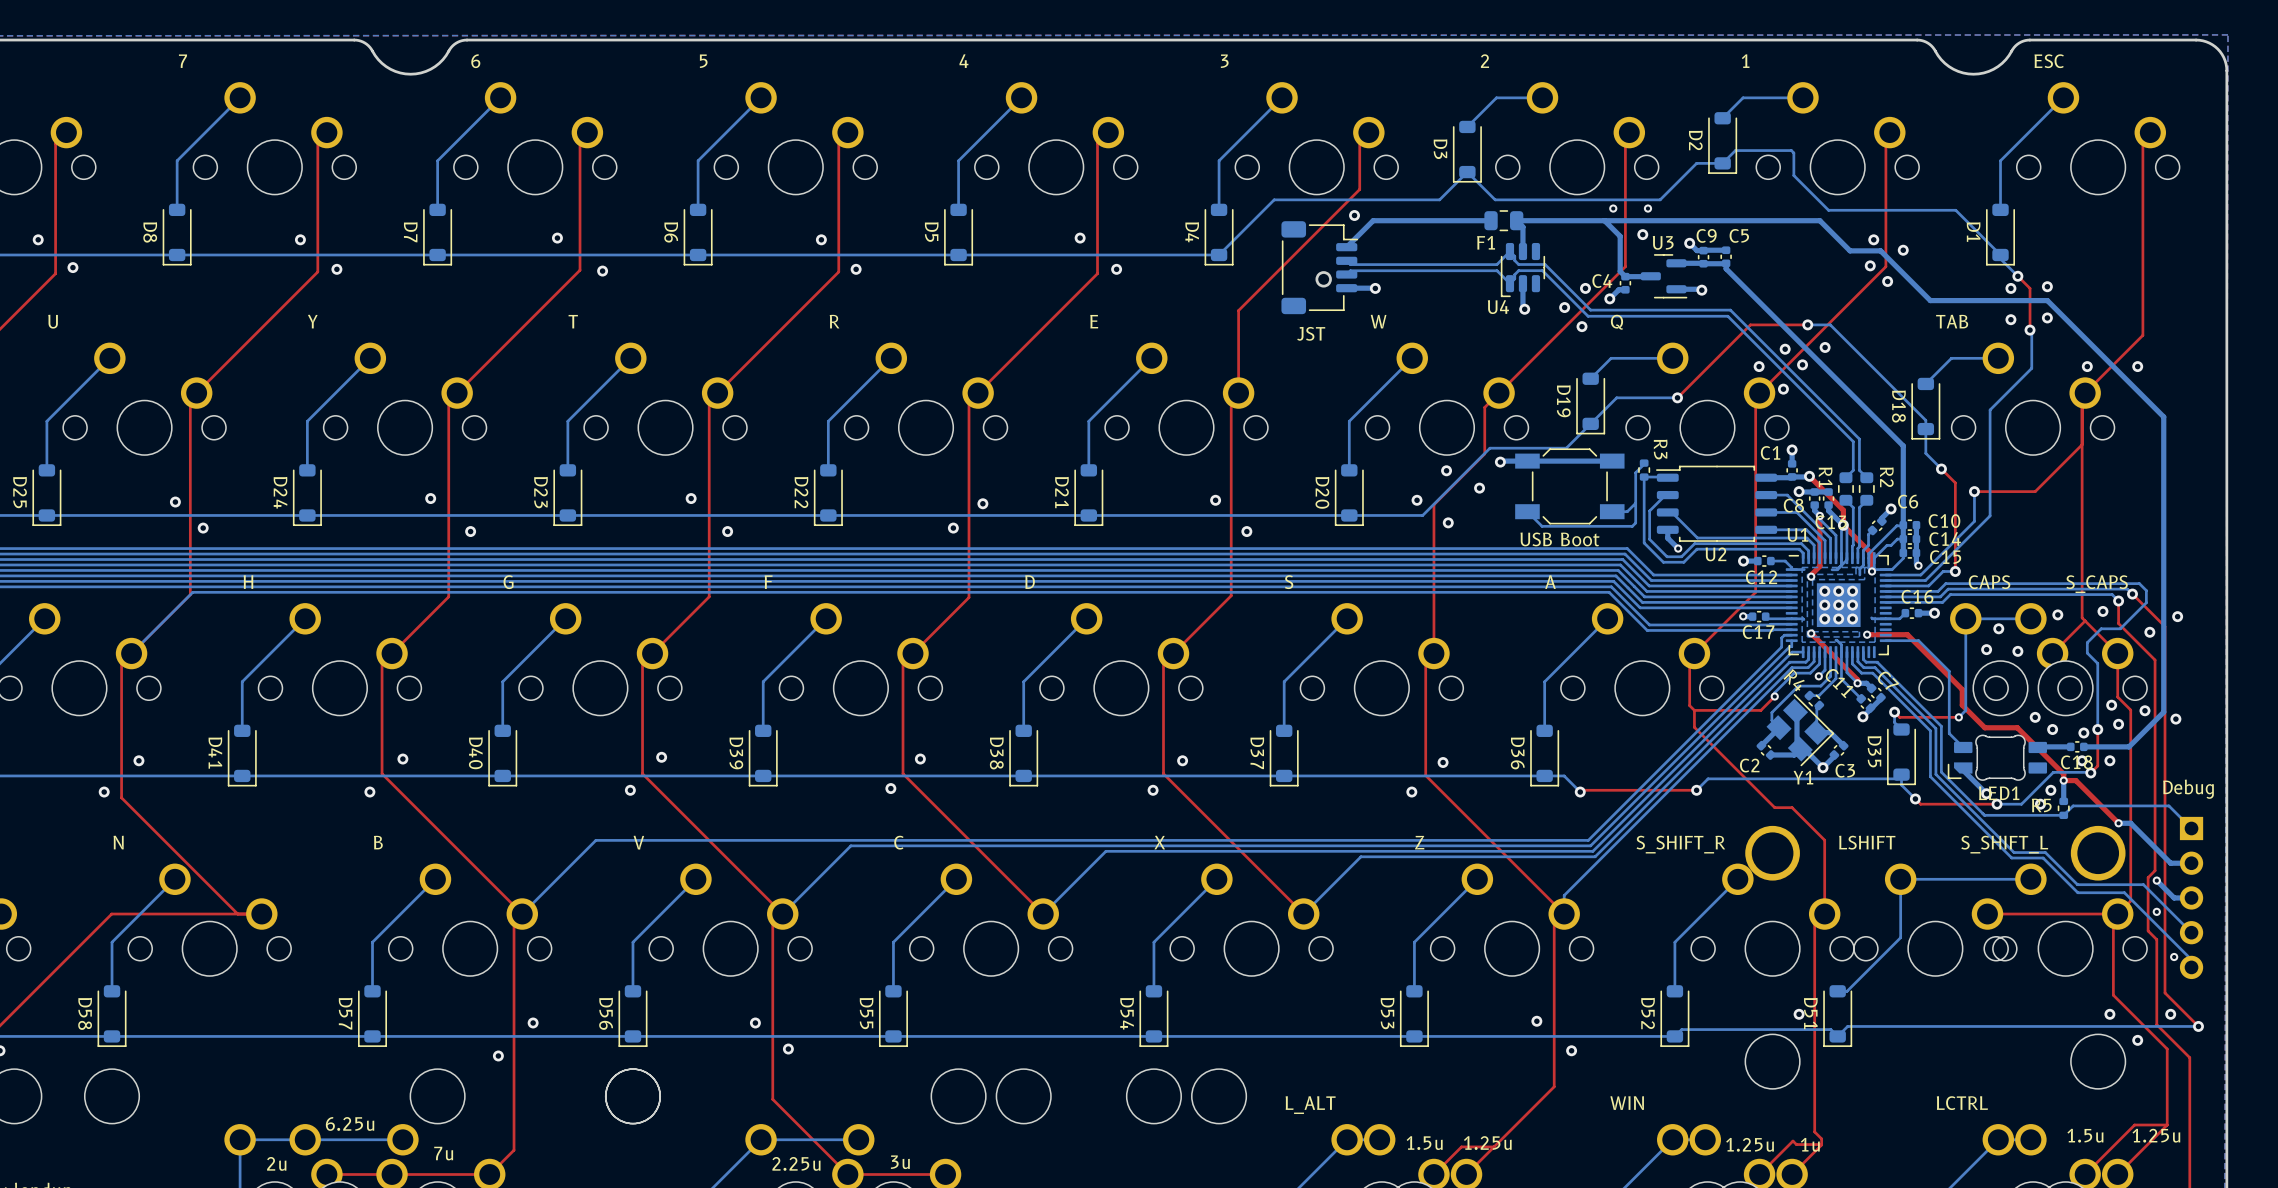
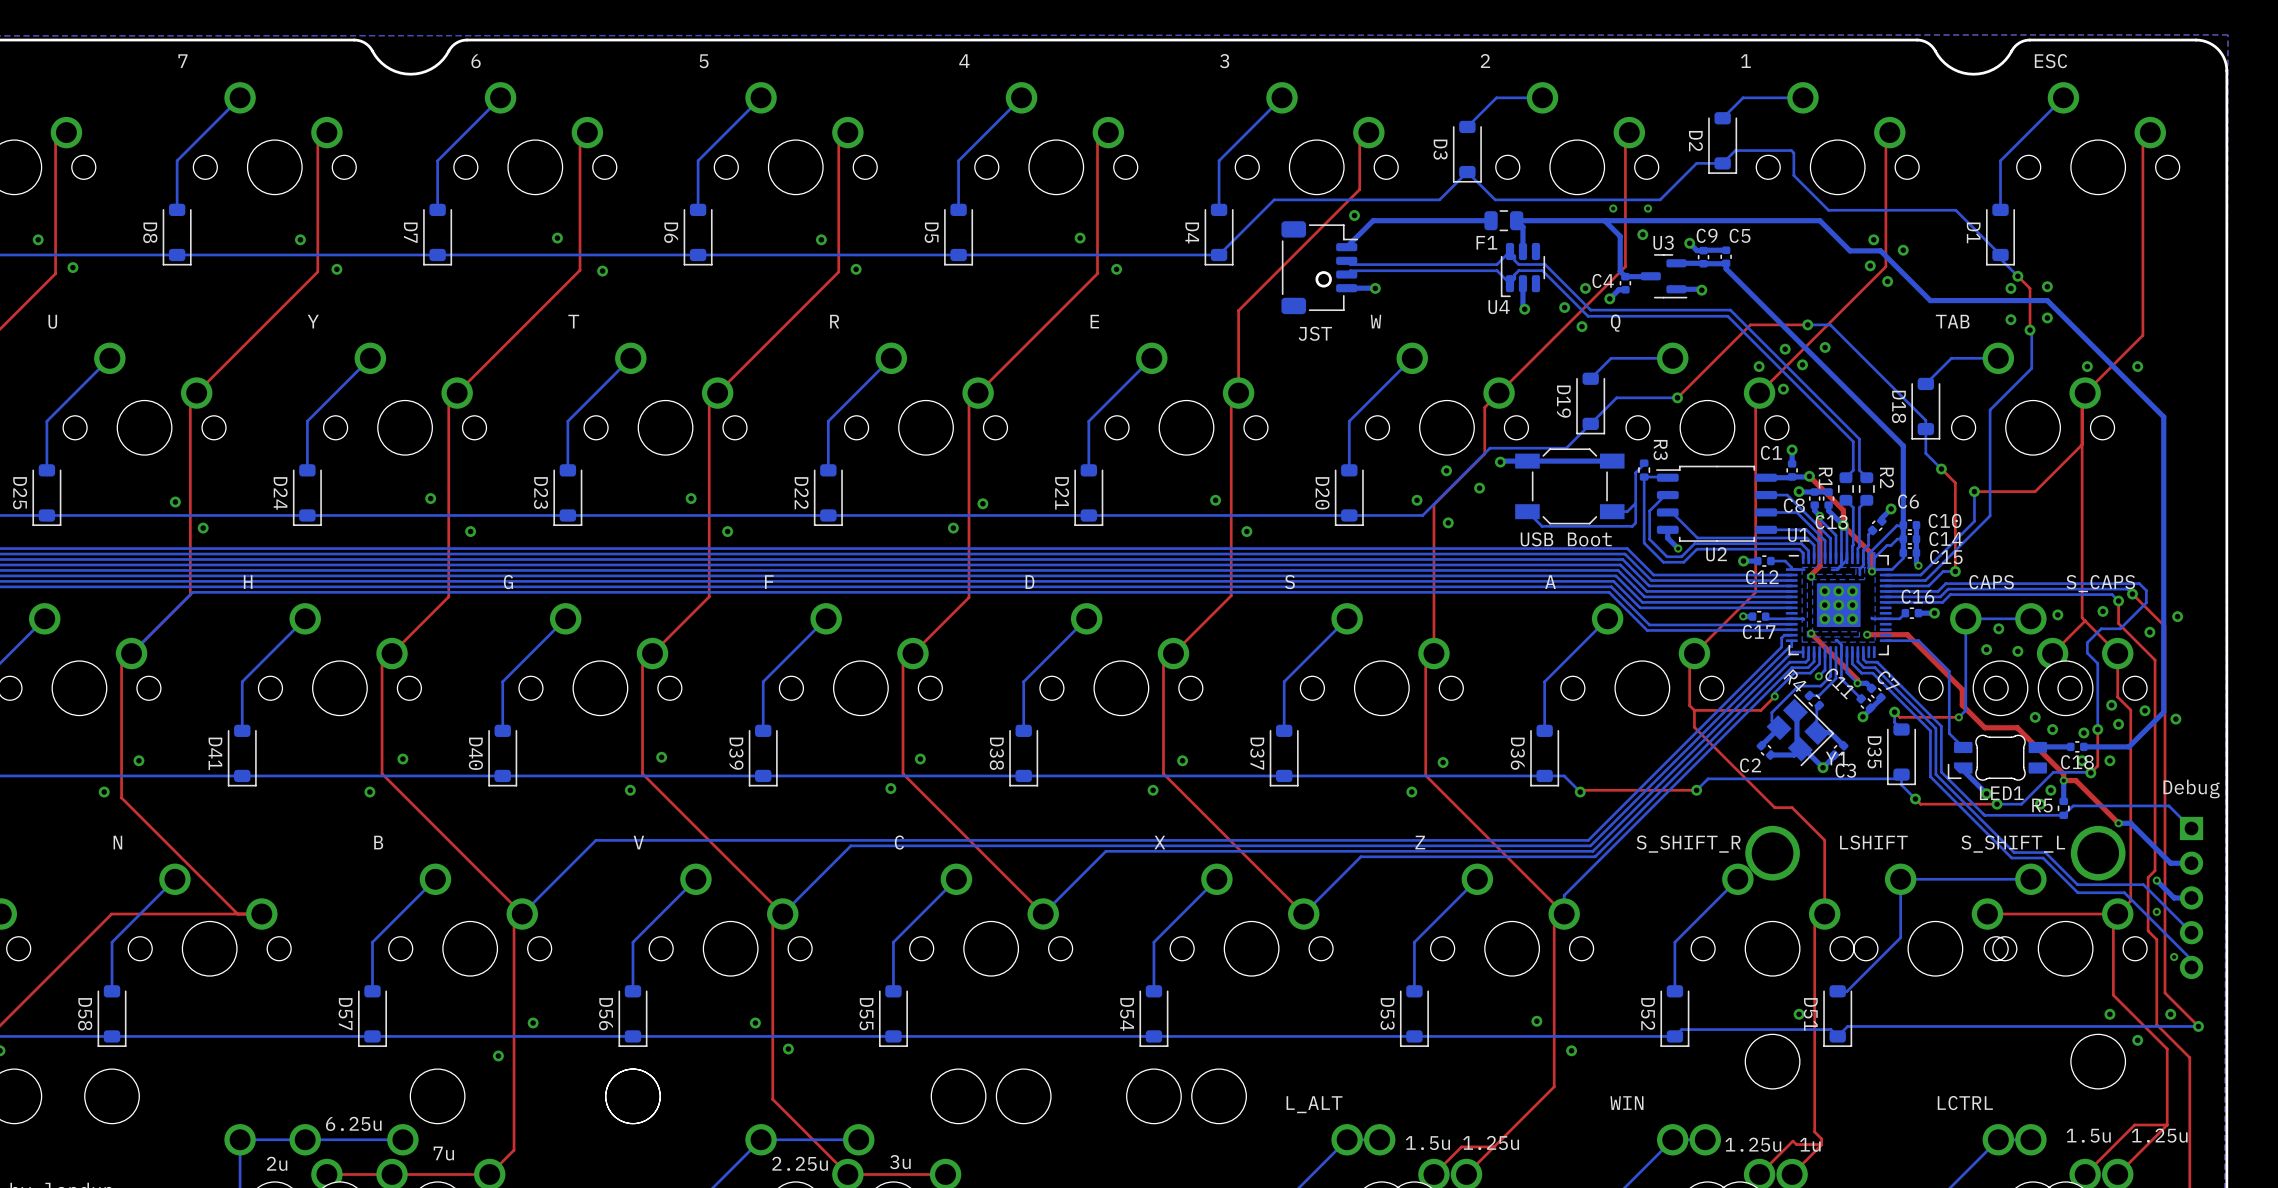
Y1 name position: Y1 (1803, 777) -> Y1 (1836, 758)

